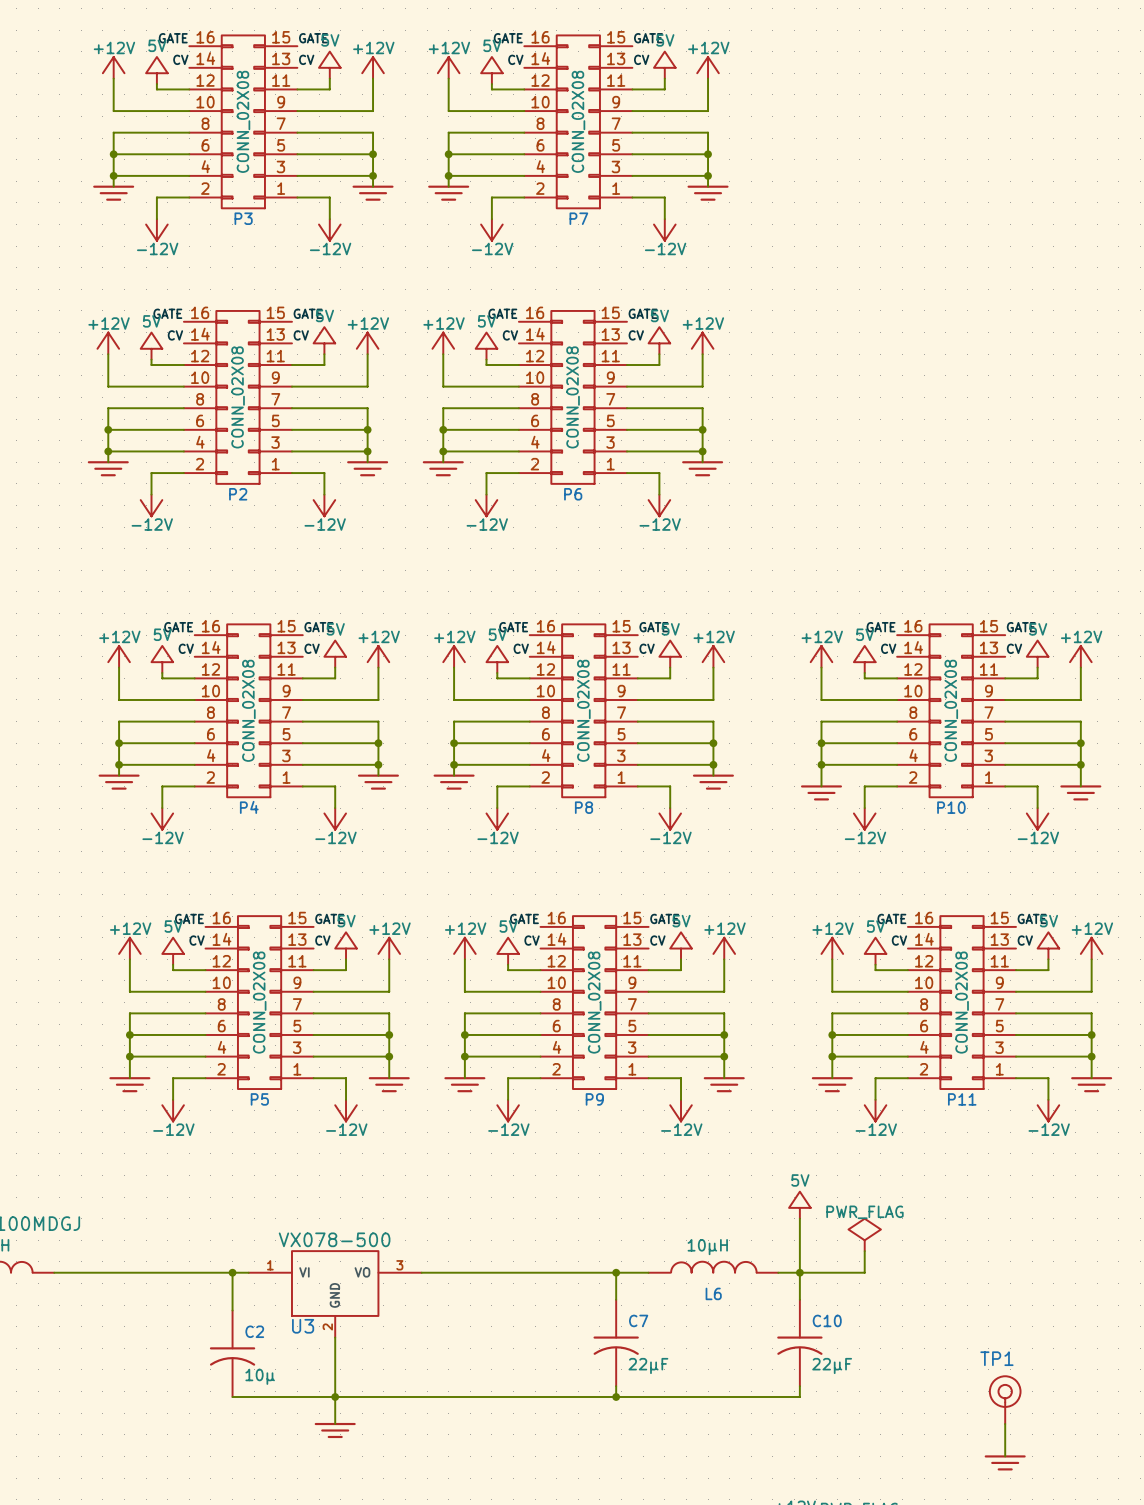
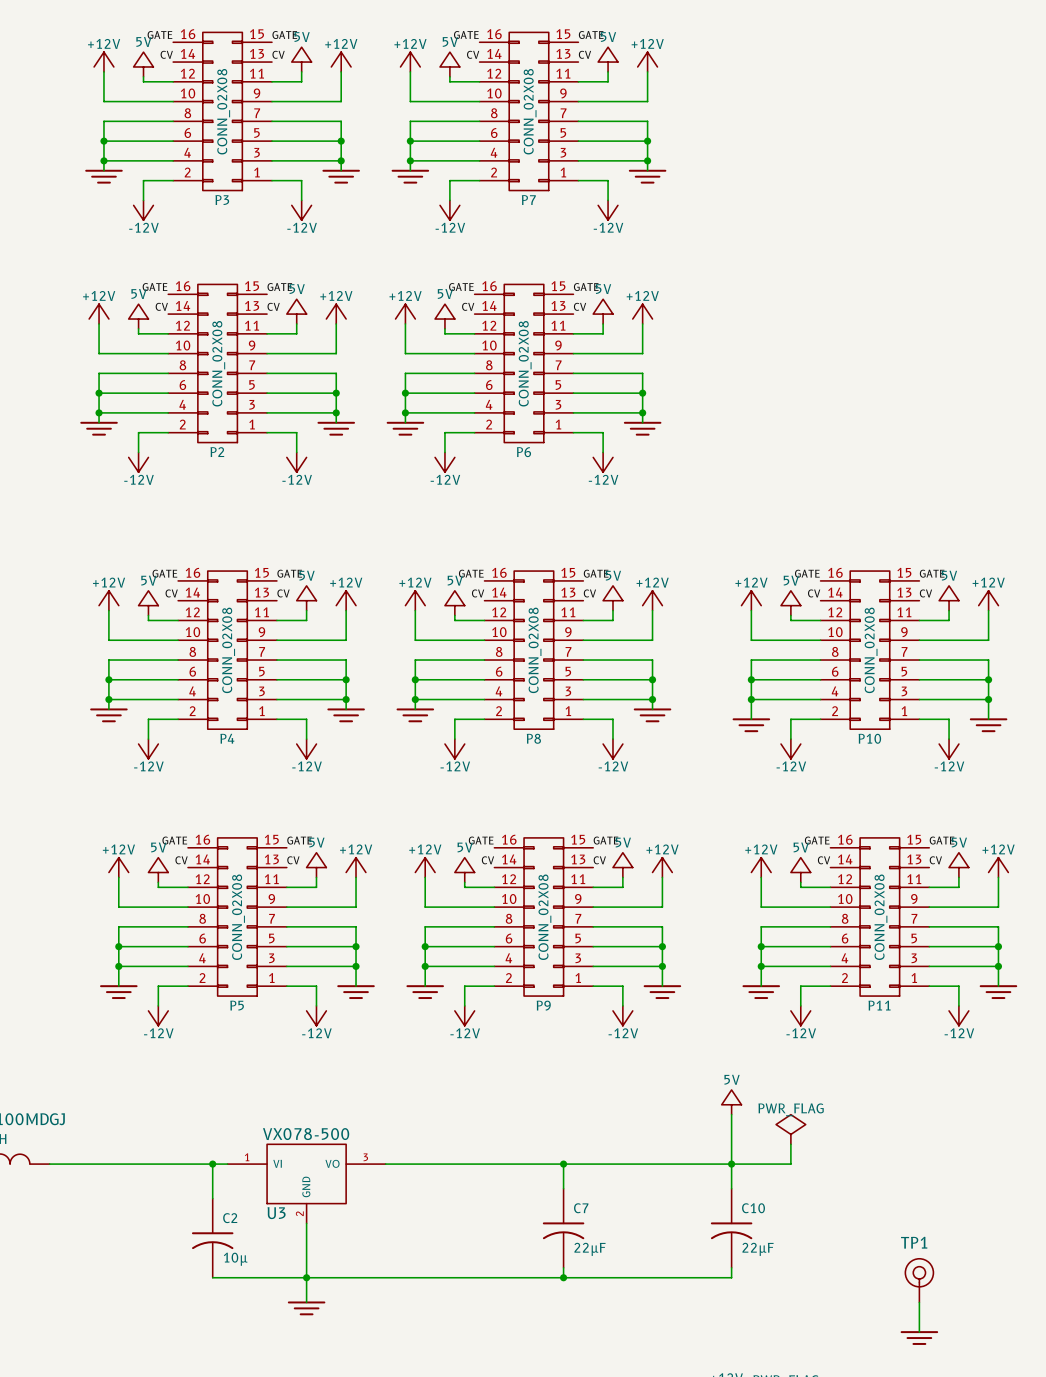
L6: 10µH (713, 1267) -> none
wire: none -> (593, 1164) (711, 1164)

